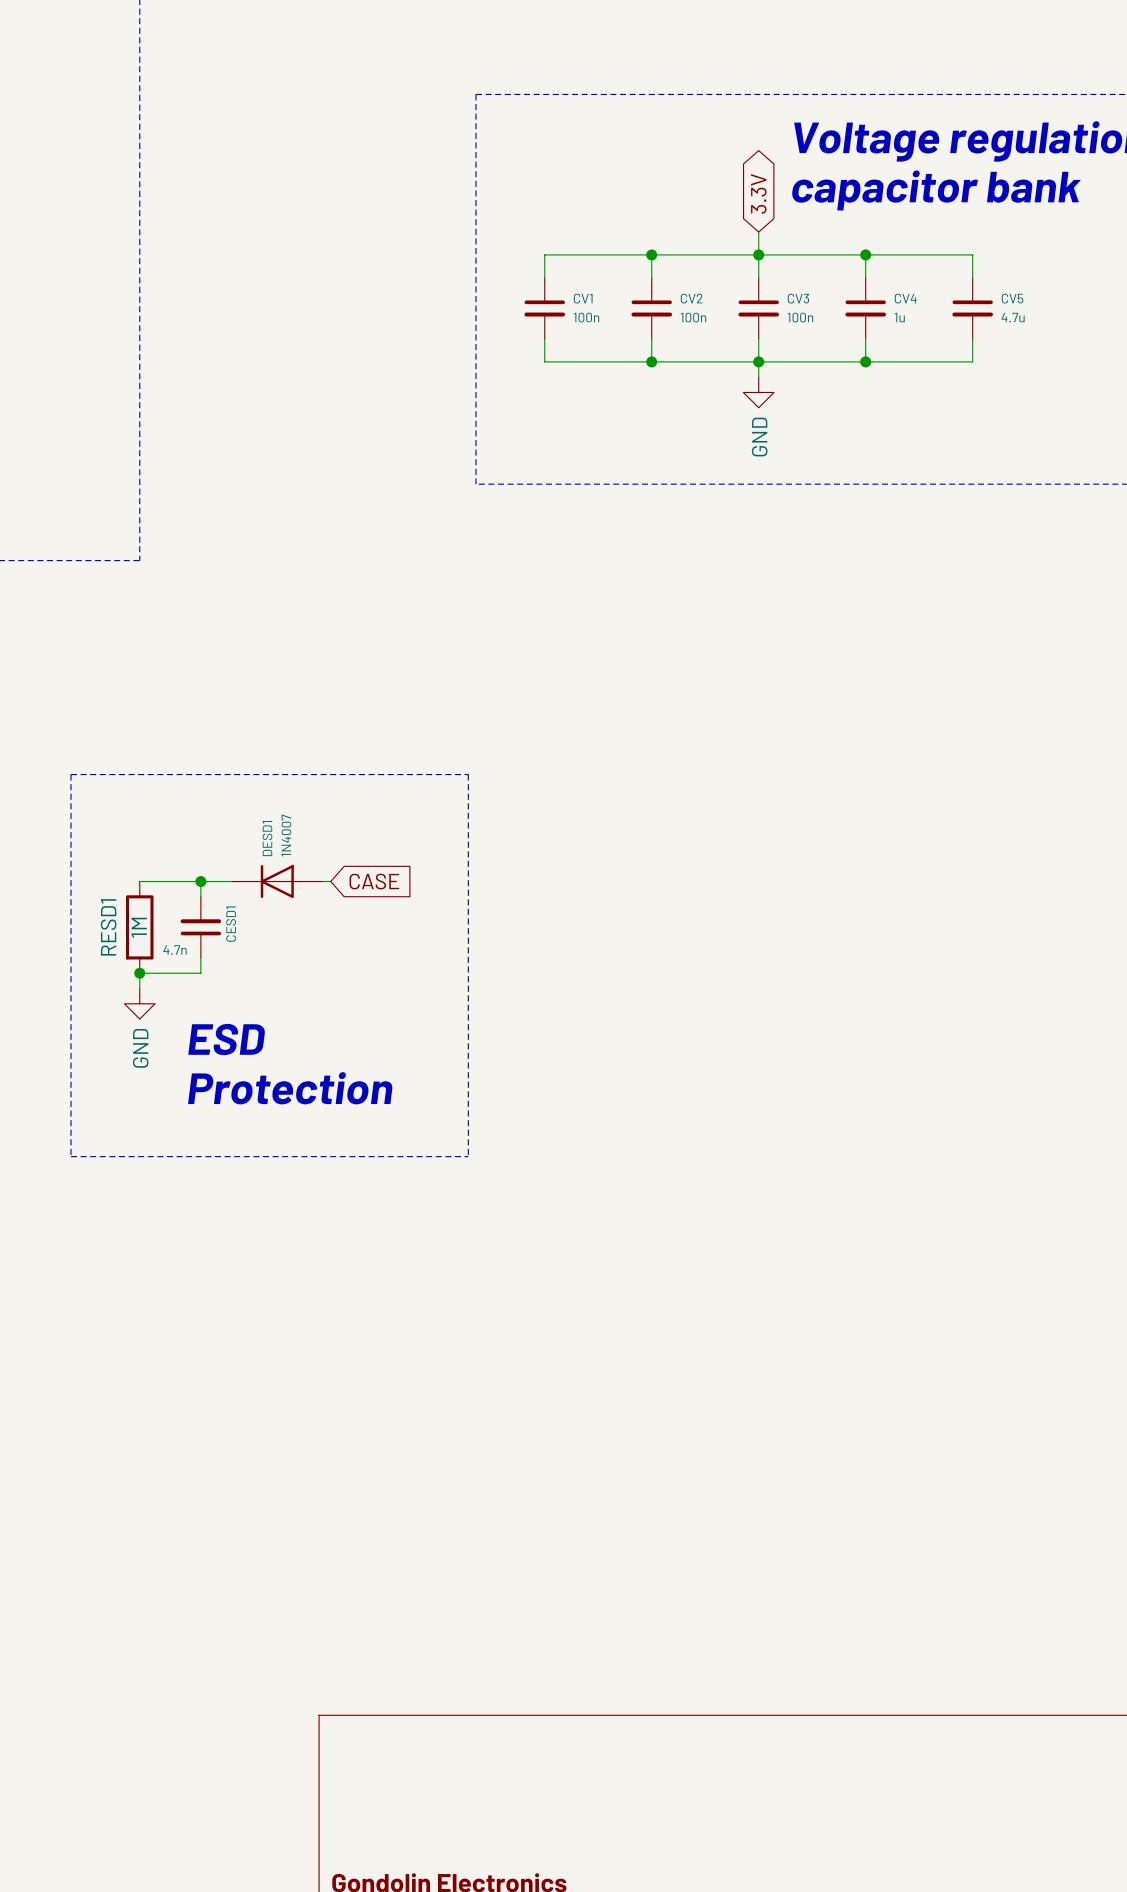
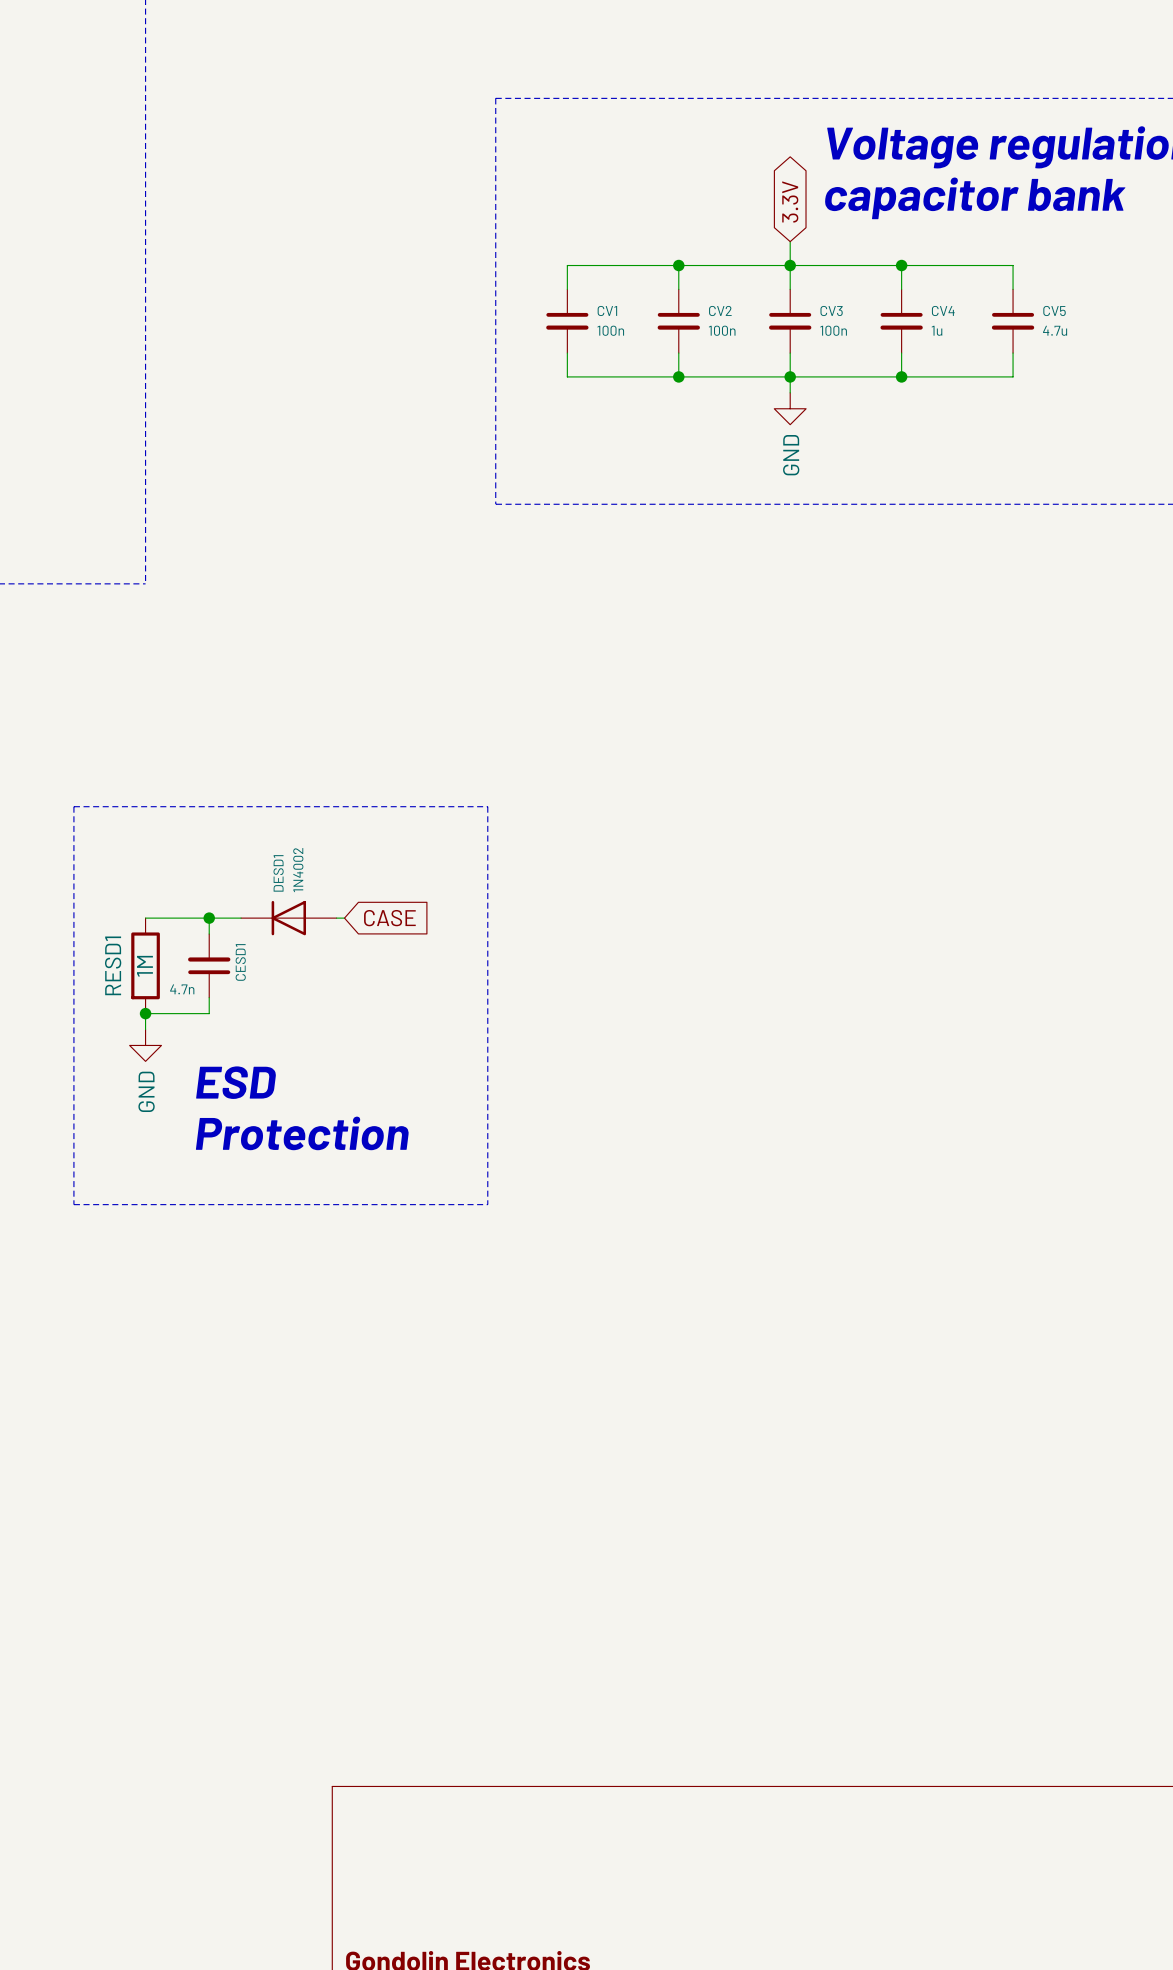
DESD1 value: 1N4007 (286, 835) -> 1N4002 (298, 870)

